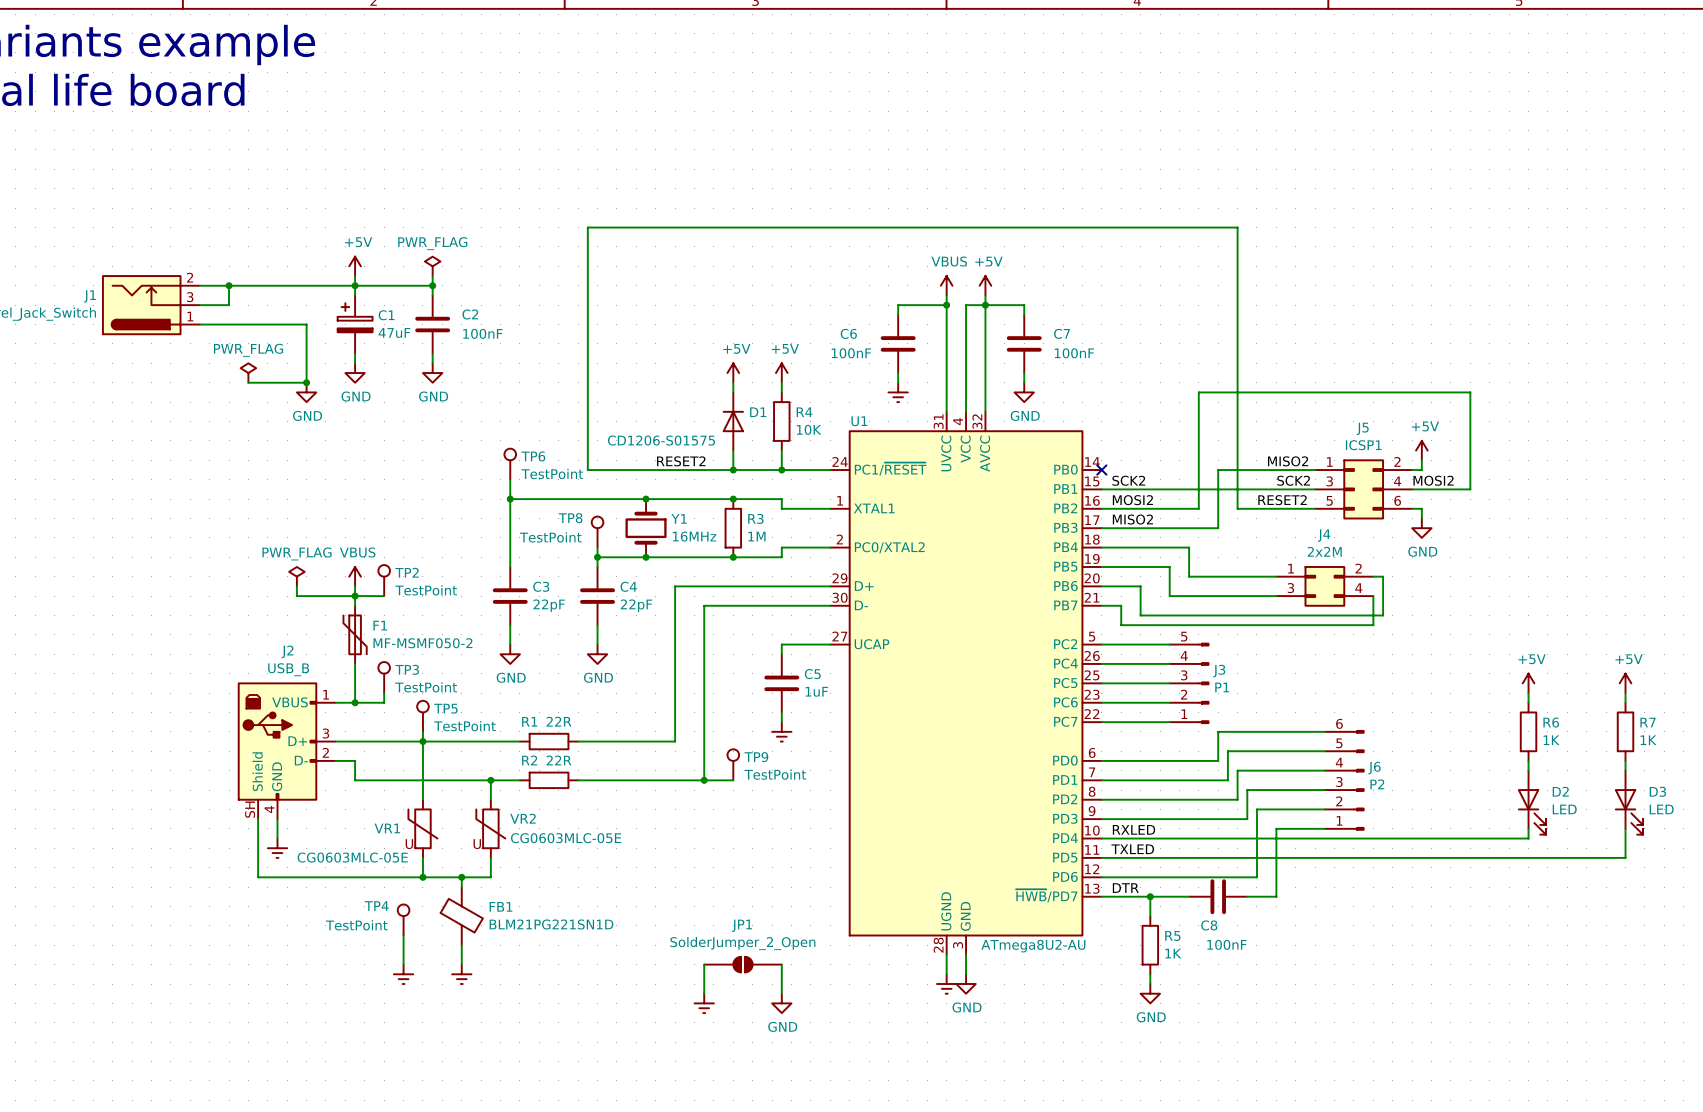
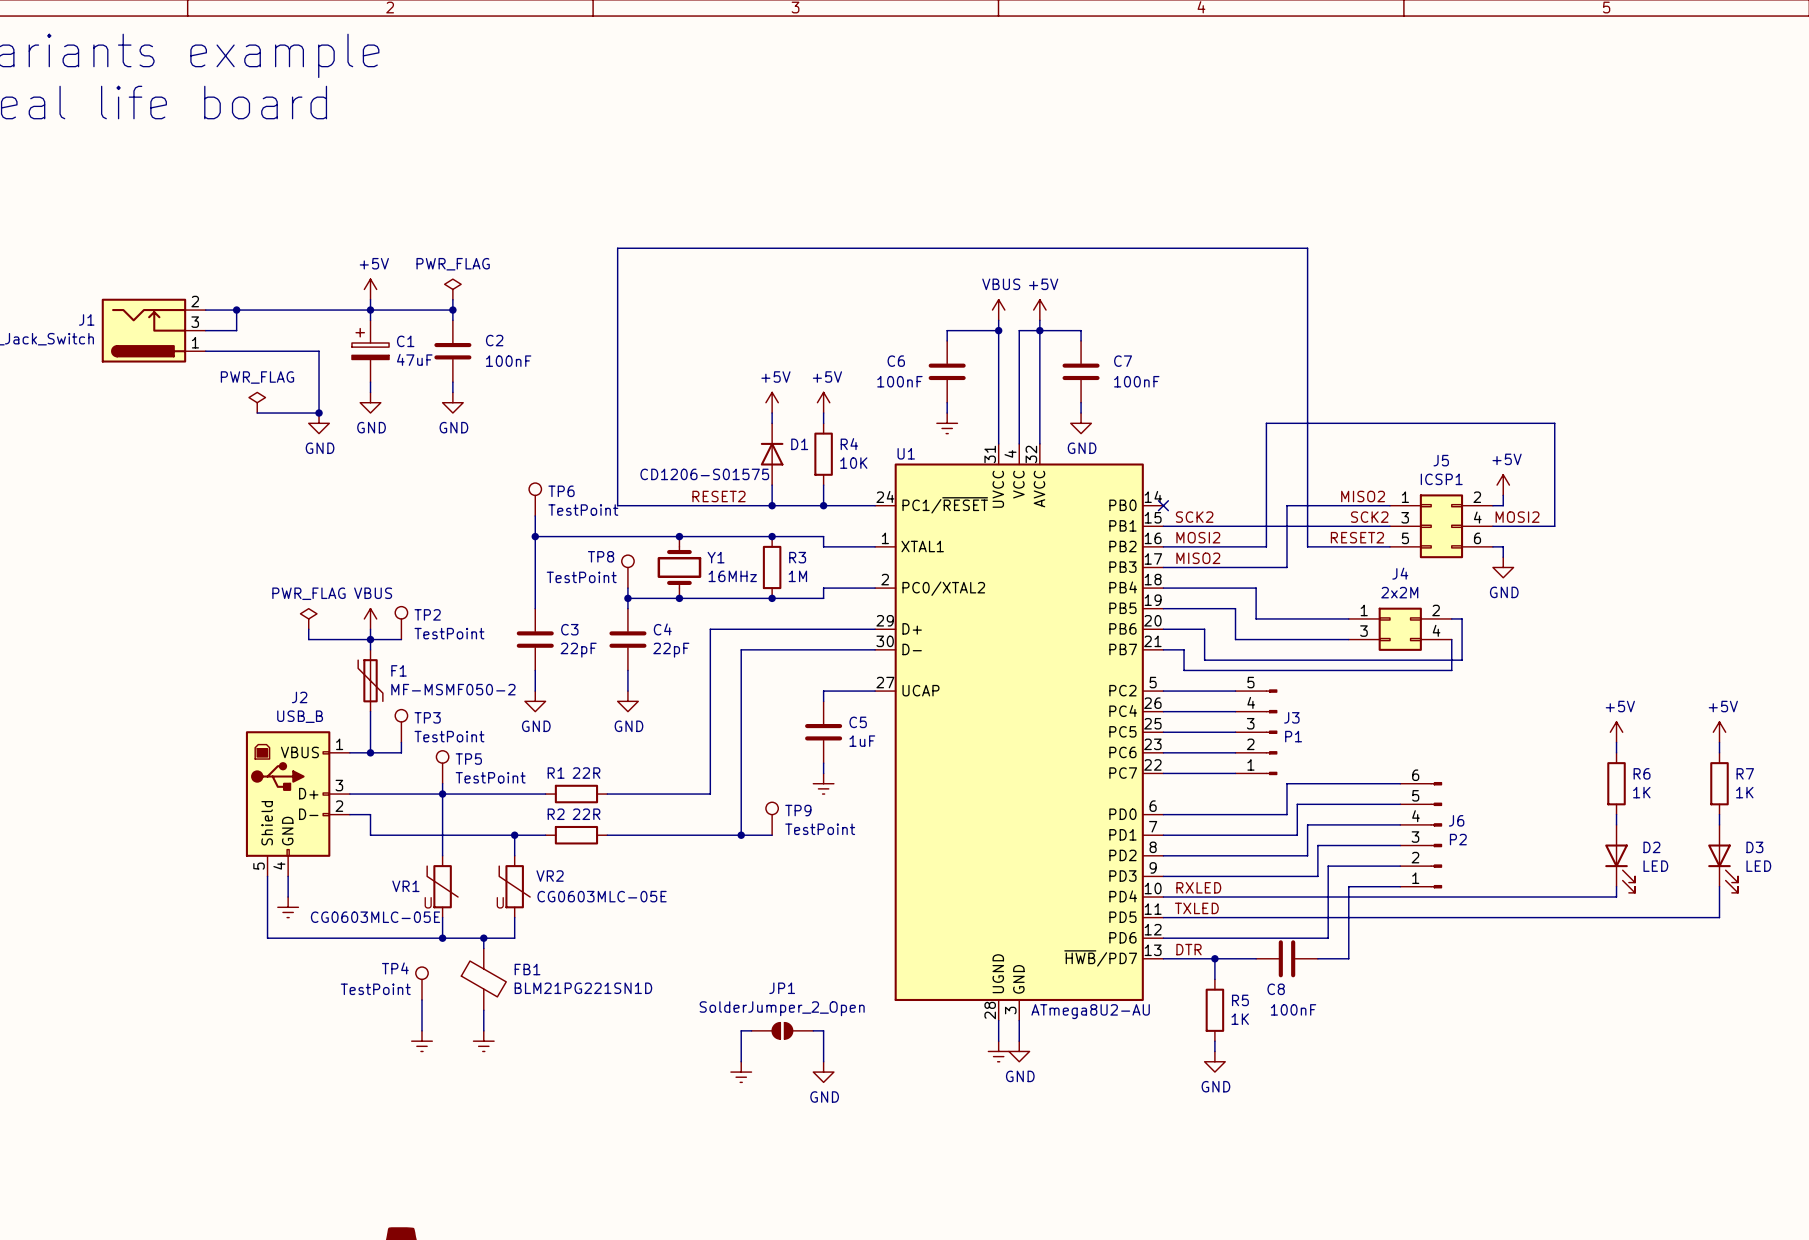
J2 pin number: SH (250, 809) -> 5 (259, 866)
JP1 symbol: [704, 956, 782, 973] -> [751, 1022, 814, 1040]

